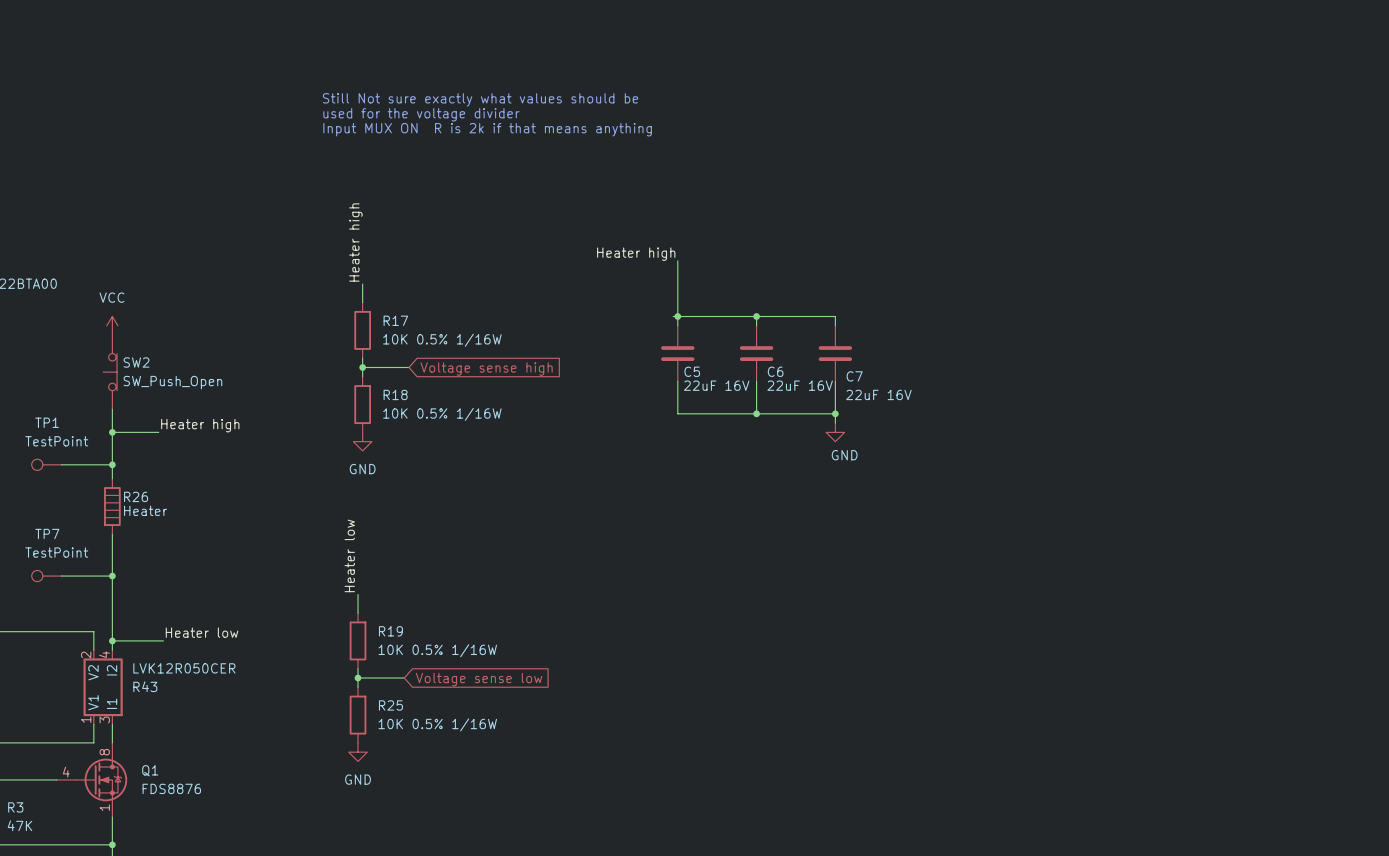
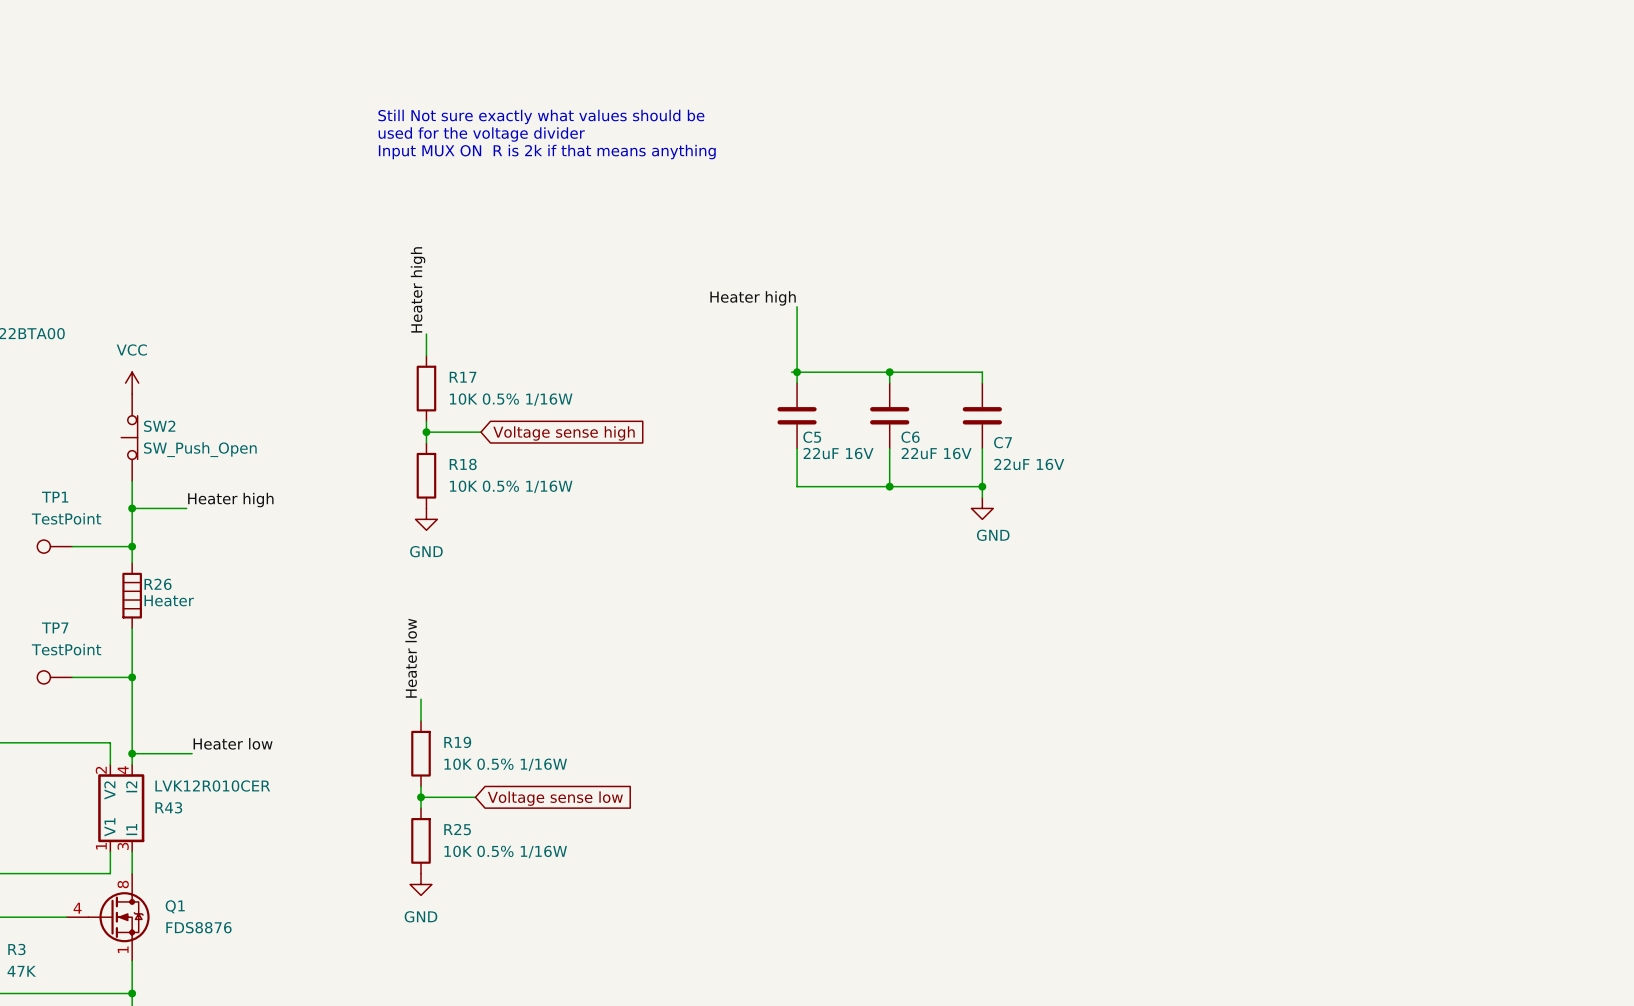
R43 value: LVK12R050CER (184, 668) -> LVK12R010CER (212, 786)

